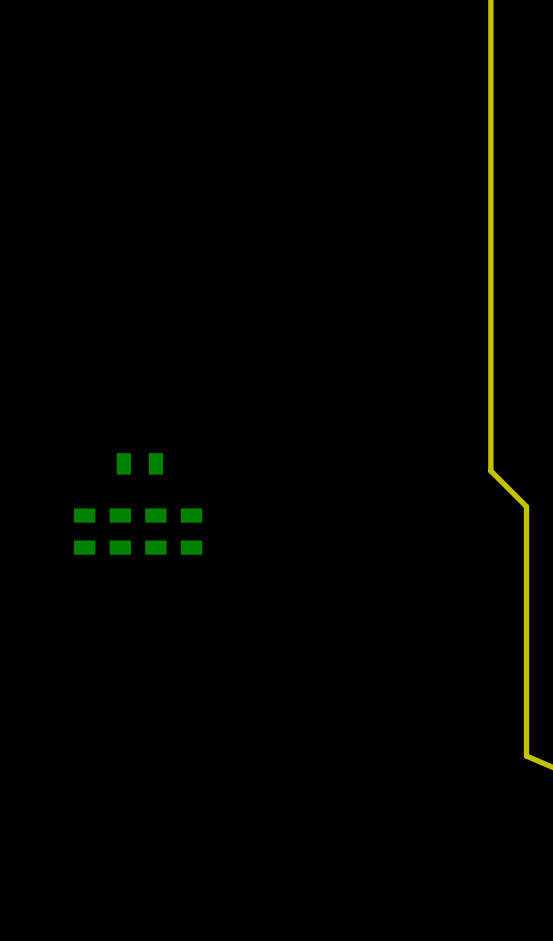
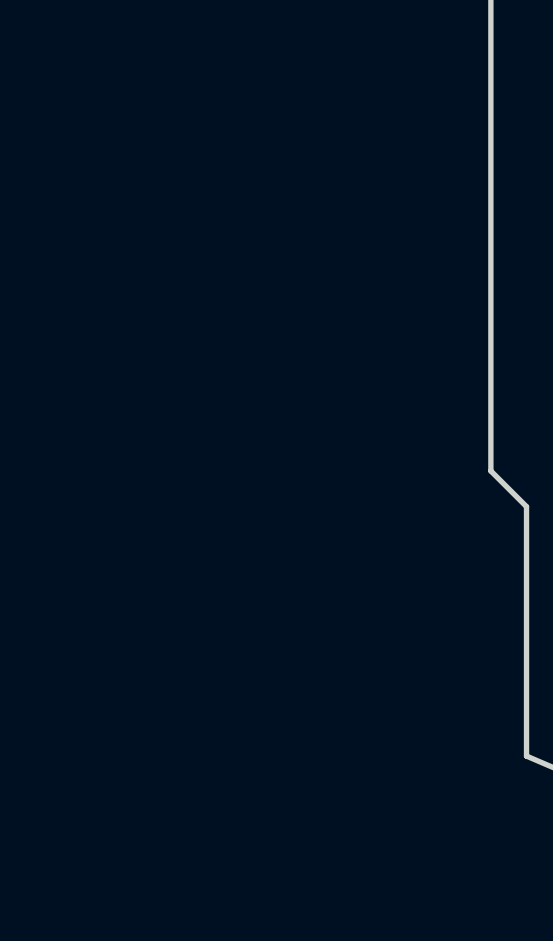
part: (139, 463) -> none
part: (84, 531) -> none
part: (120, 531) -> none
part: (155, 531) -> none
part: (191, 531) -> none

